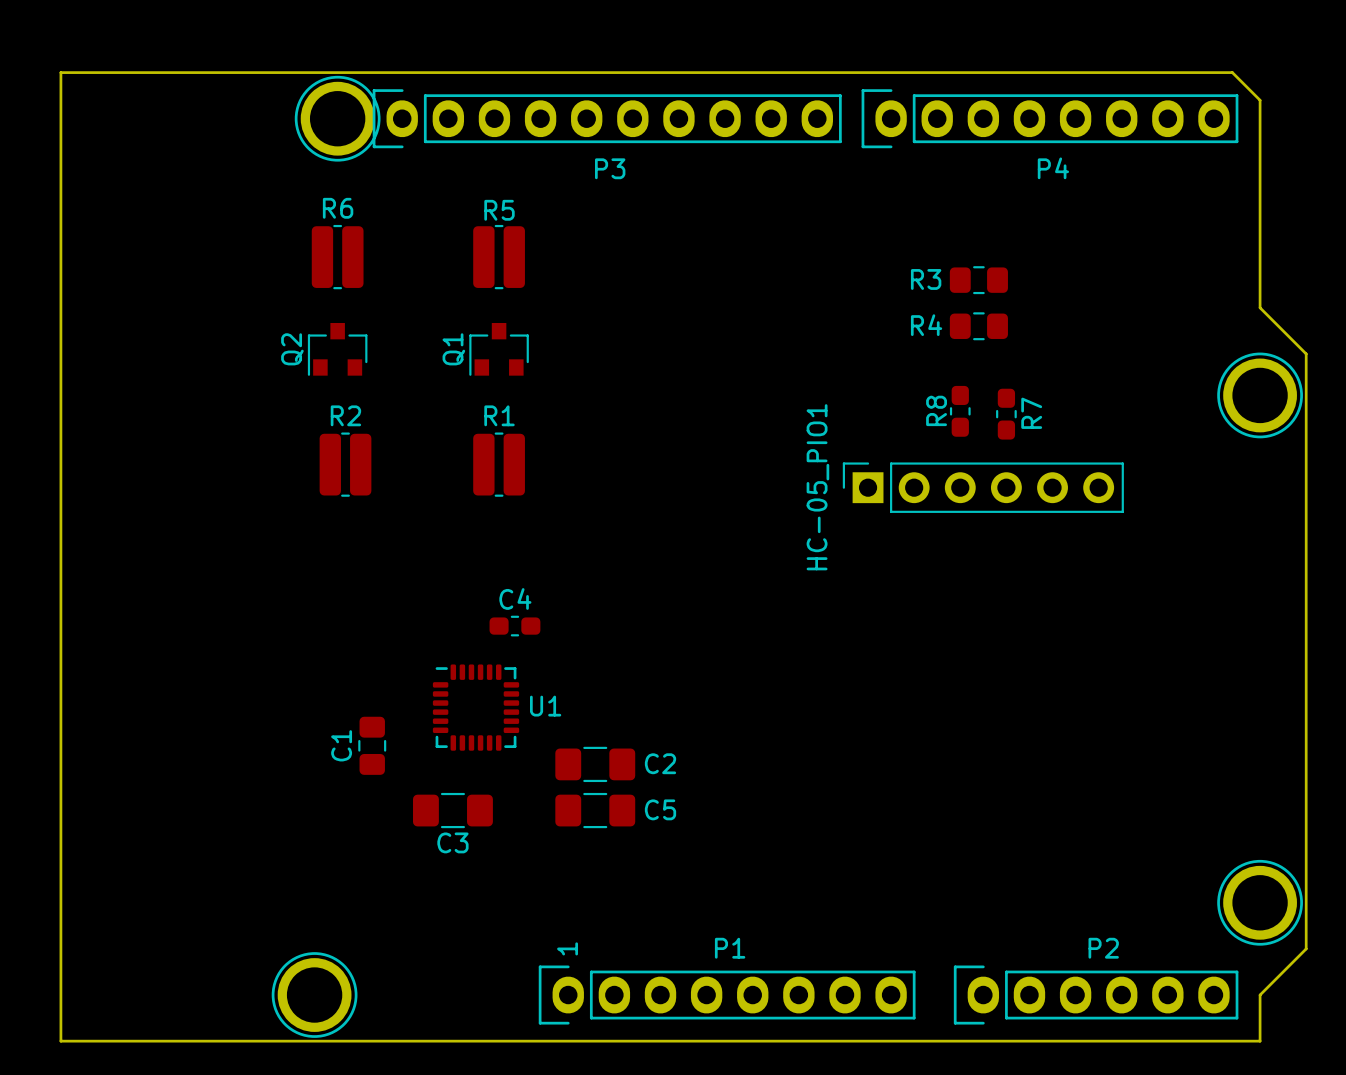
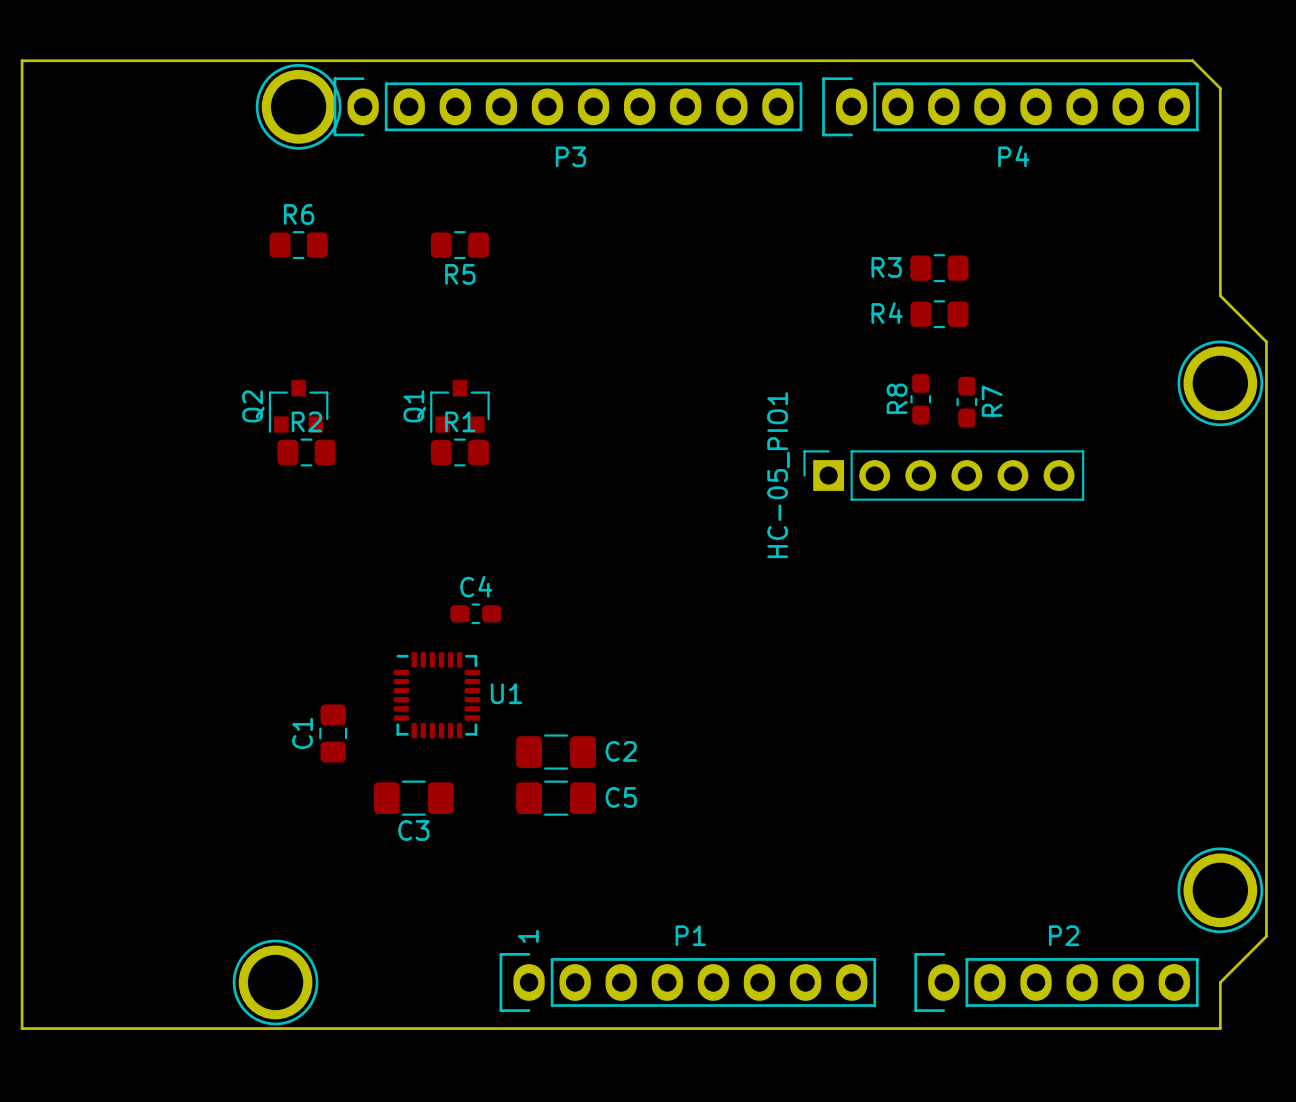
R5 name position: R5 (499, 210) -> R5 (460, 274)
R6 footprint: [311, 224, 364, 290] -> [269, 231, 328, 260]
R5 footprint: [473, 224, 525, 290] -> [430, 231, 489, 260]
Q2 position: (337, 349) -> (298, 406)
Q1 position: (499, 349) -> (459, 406)
R2 footprint: [319, 432, 372, 497] -> [277, 438, 336, 467]
R1 footprint: [473, 432, 525, 497] -> [430, 438, 489, 467]

